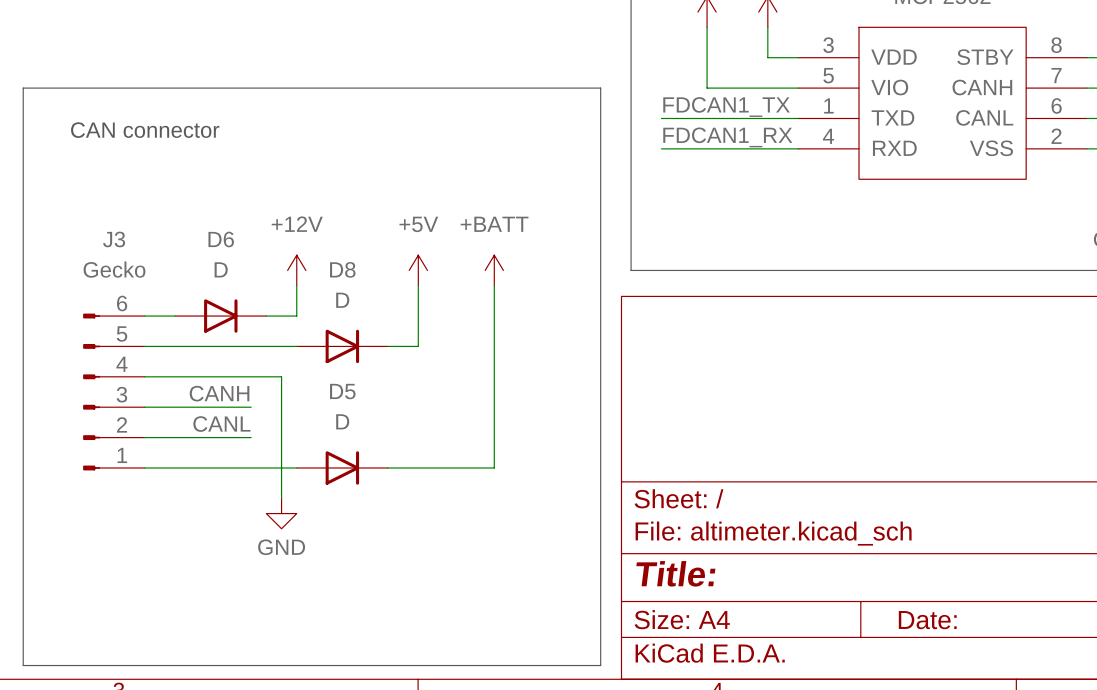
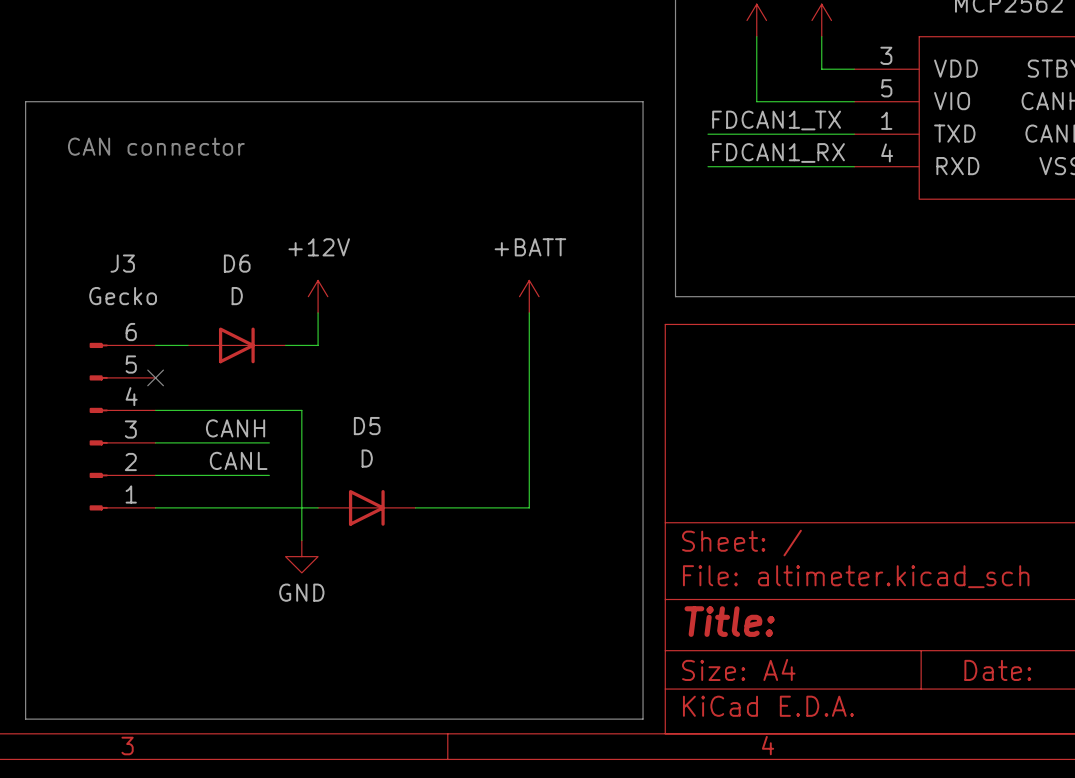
power symbol: +5V (418, 270) -> none
wire: (418, 285) (418, 346) (387, 346) -> none
wire: (144, 346) (296, 346) -> none
no-connect mark: none -> (155, 377)
D8: D (342, 346) -> none

